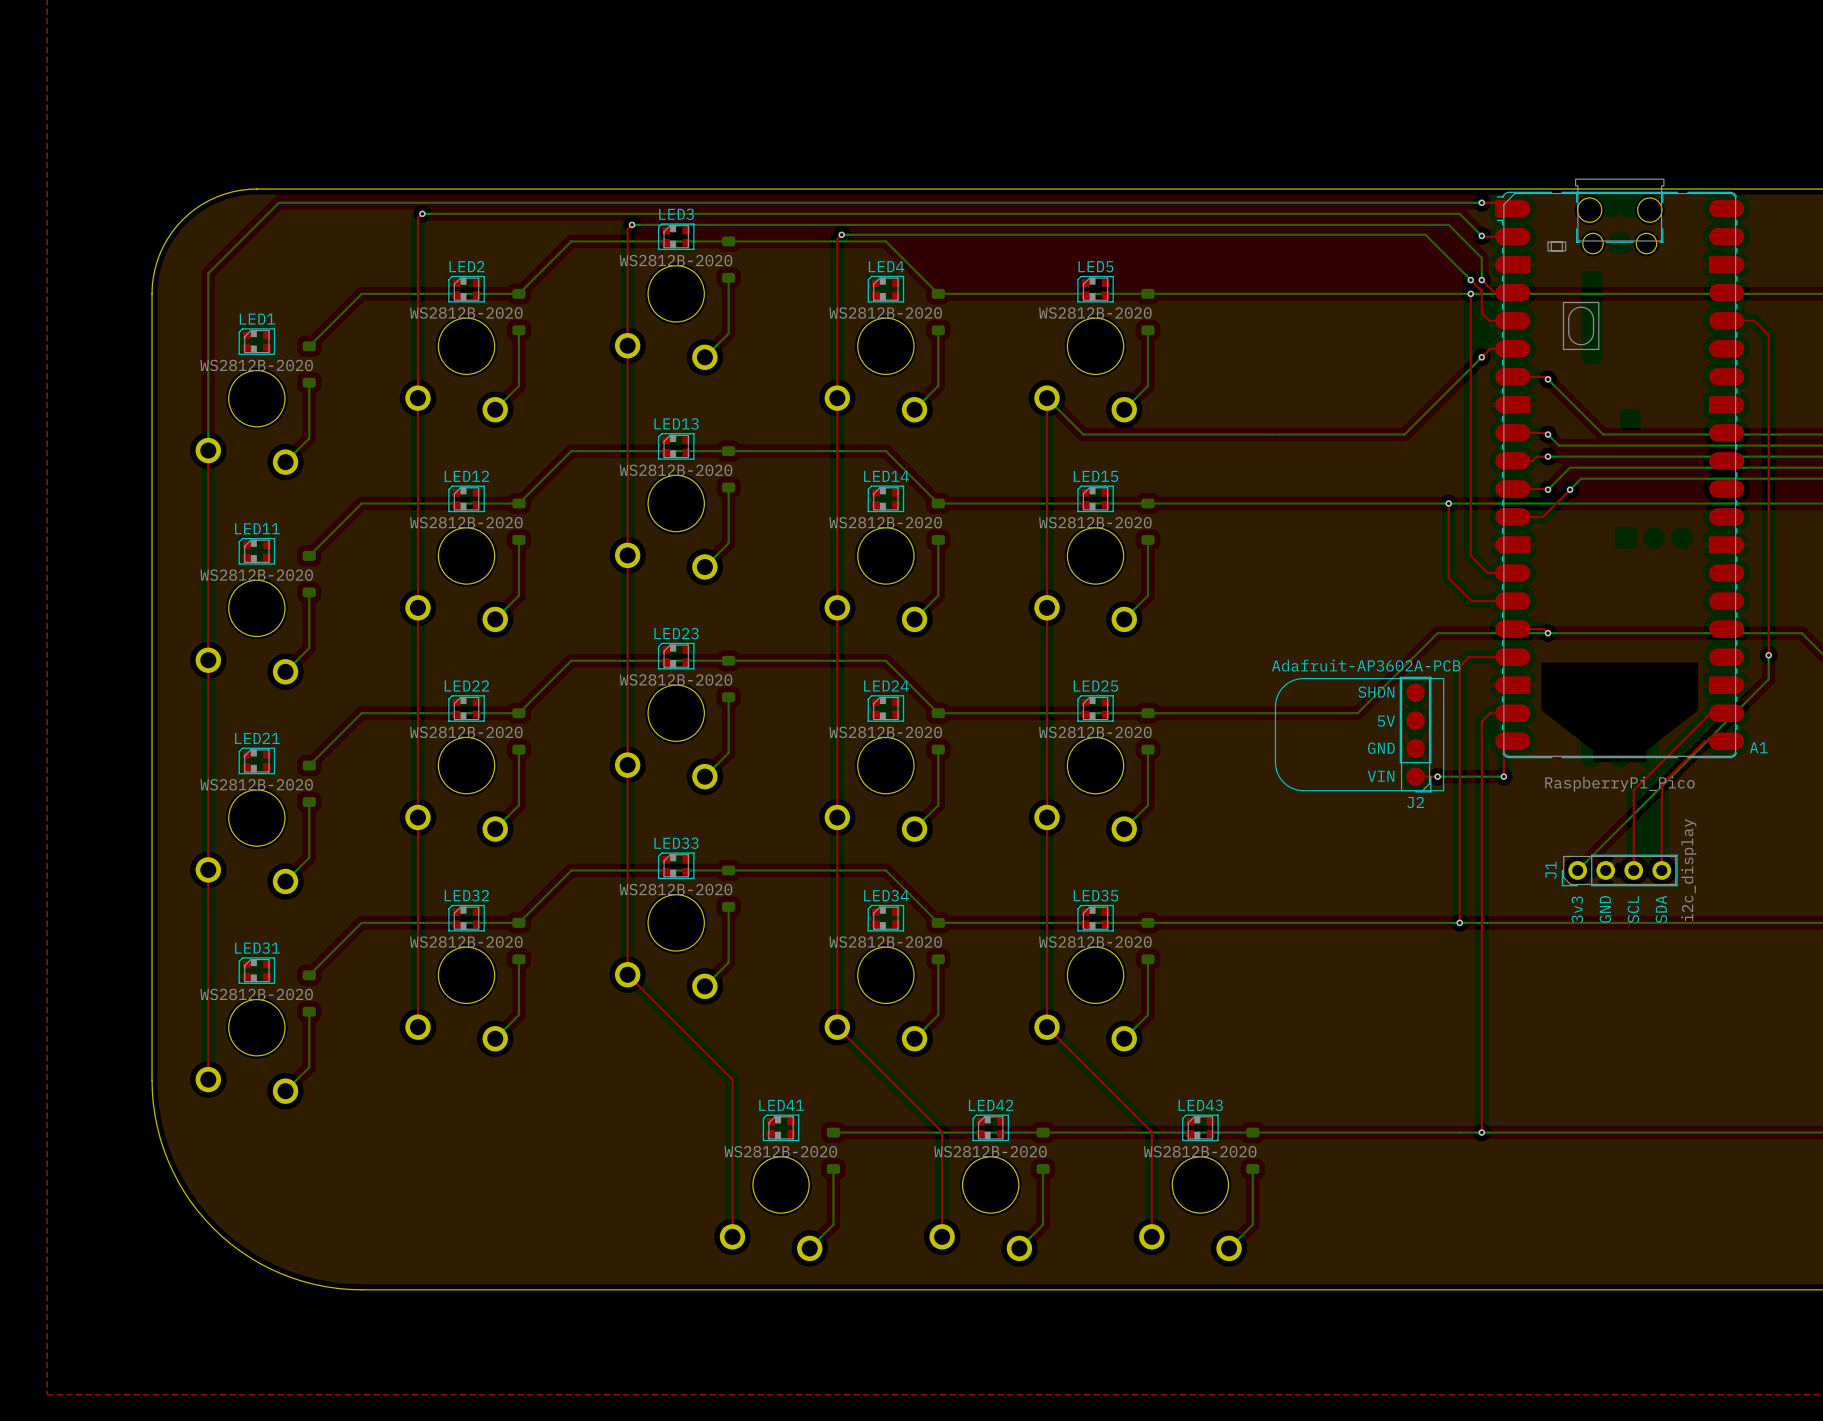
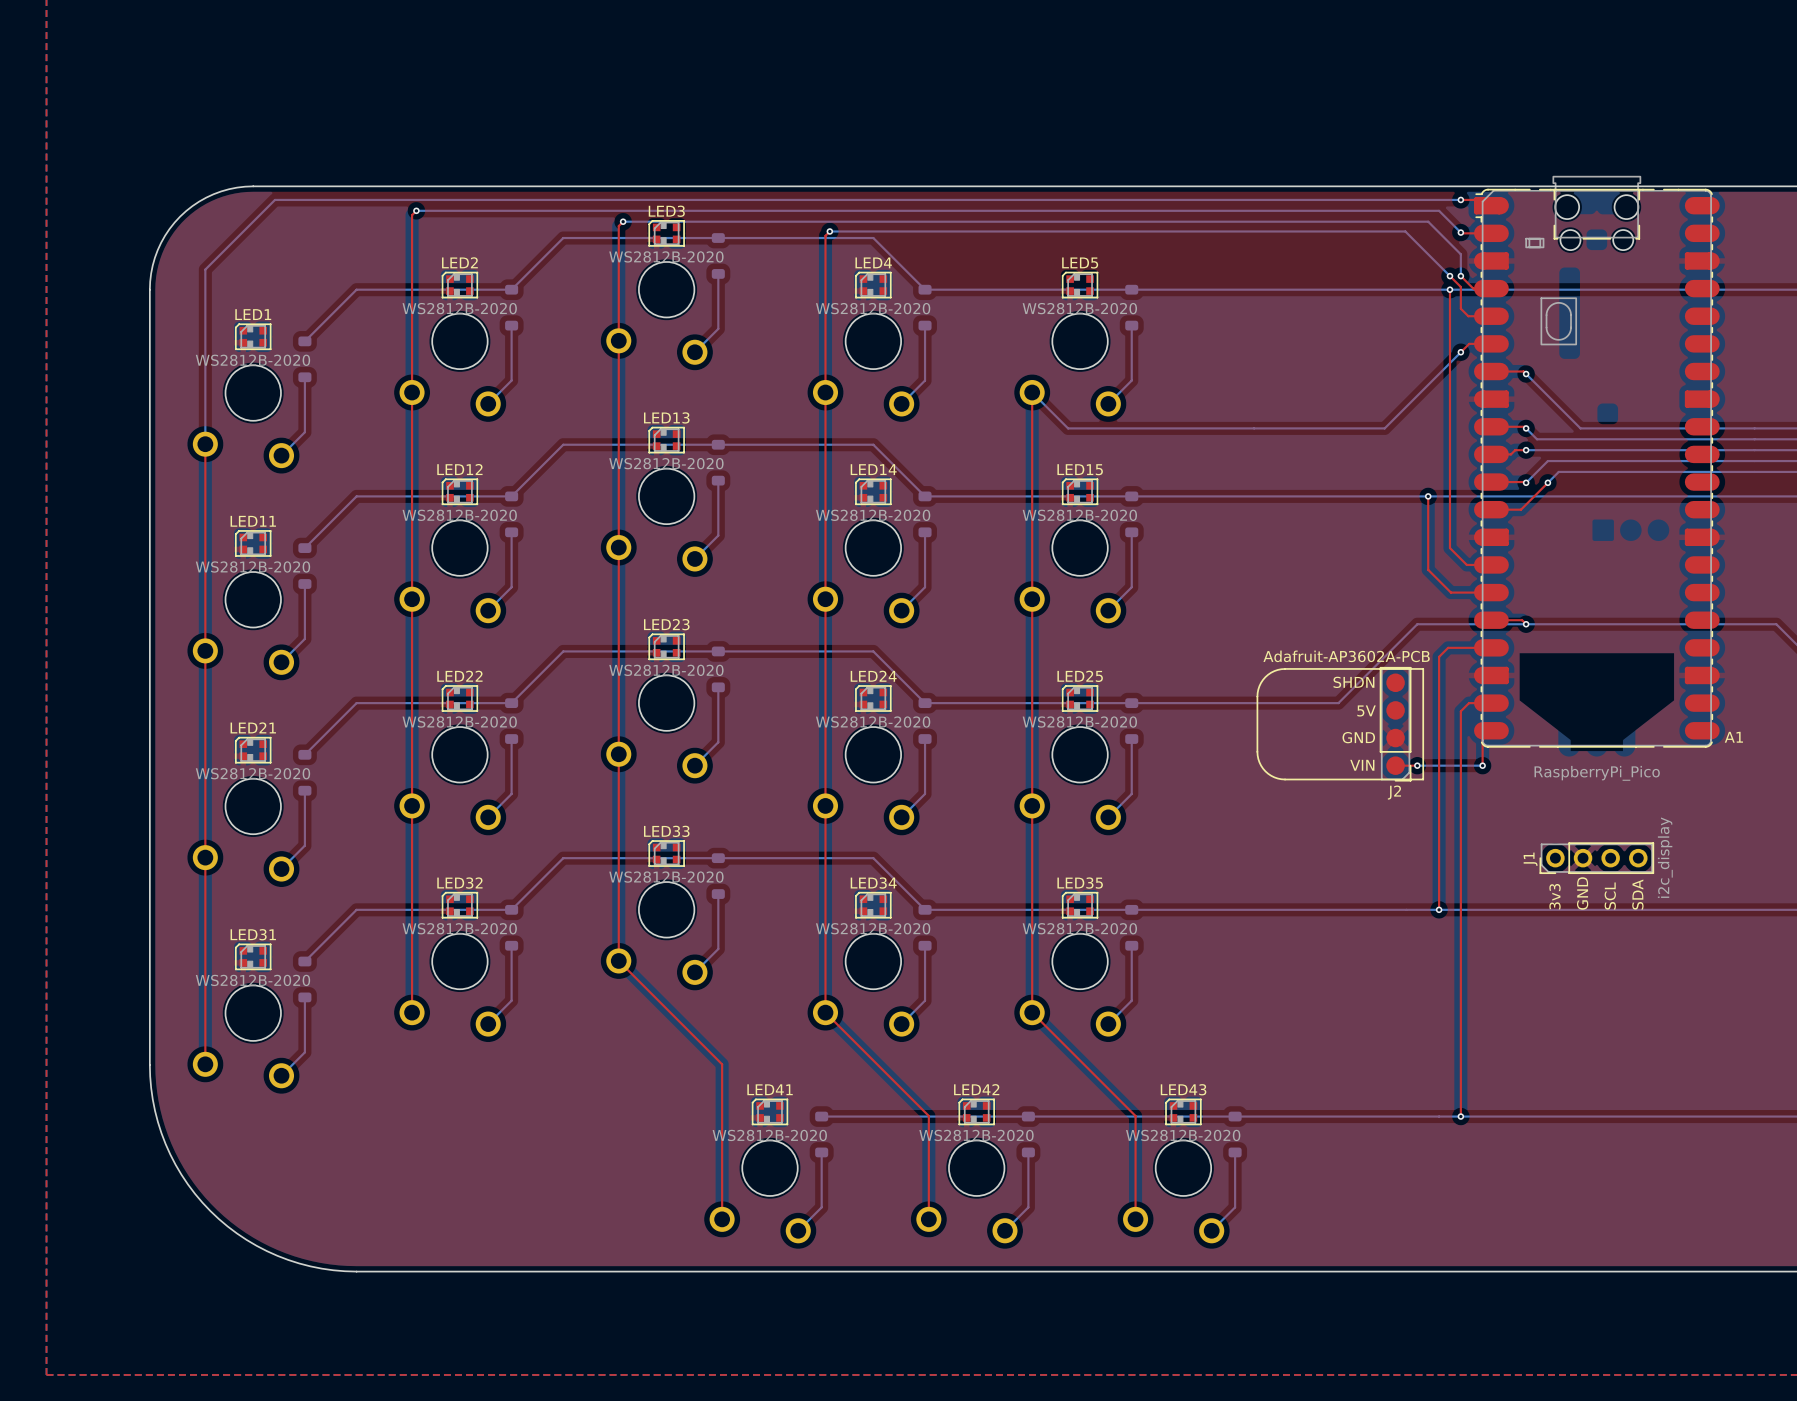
top track: (1726, 320) (1754, 320) (1768, 335) (1768, 655) -> none
bottom track: (1768, 655) (1768, 679) (1577, 870) -> none
via: (1768, 655) -> none
top track: (1726, 713) (1710, 713) (1633, 790) (1633, 870) -> none
top track: (1726, 741) (1704, 741) (1661, 784) (1661, 870) -> none

